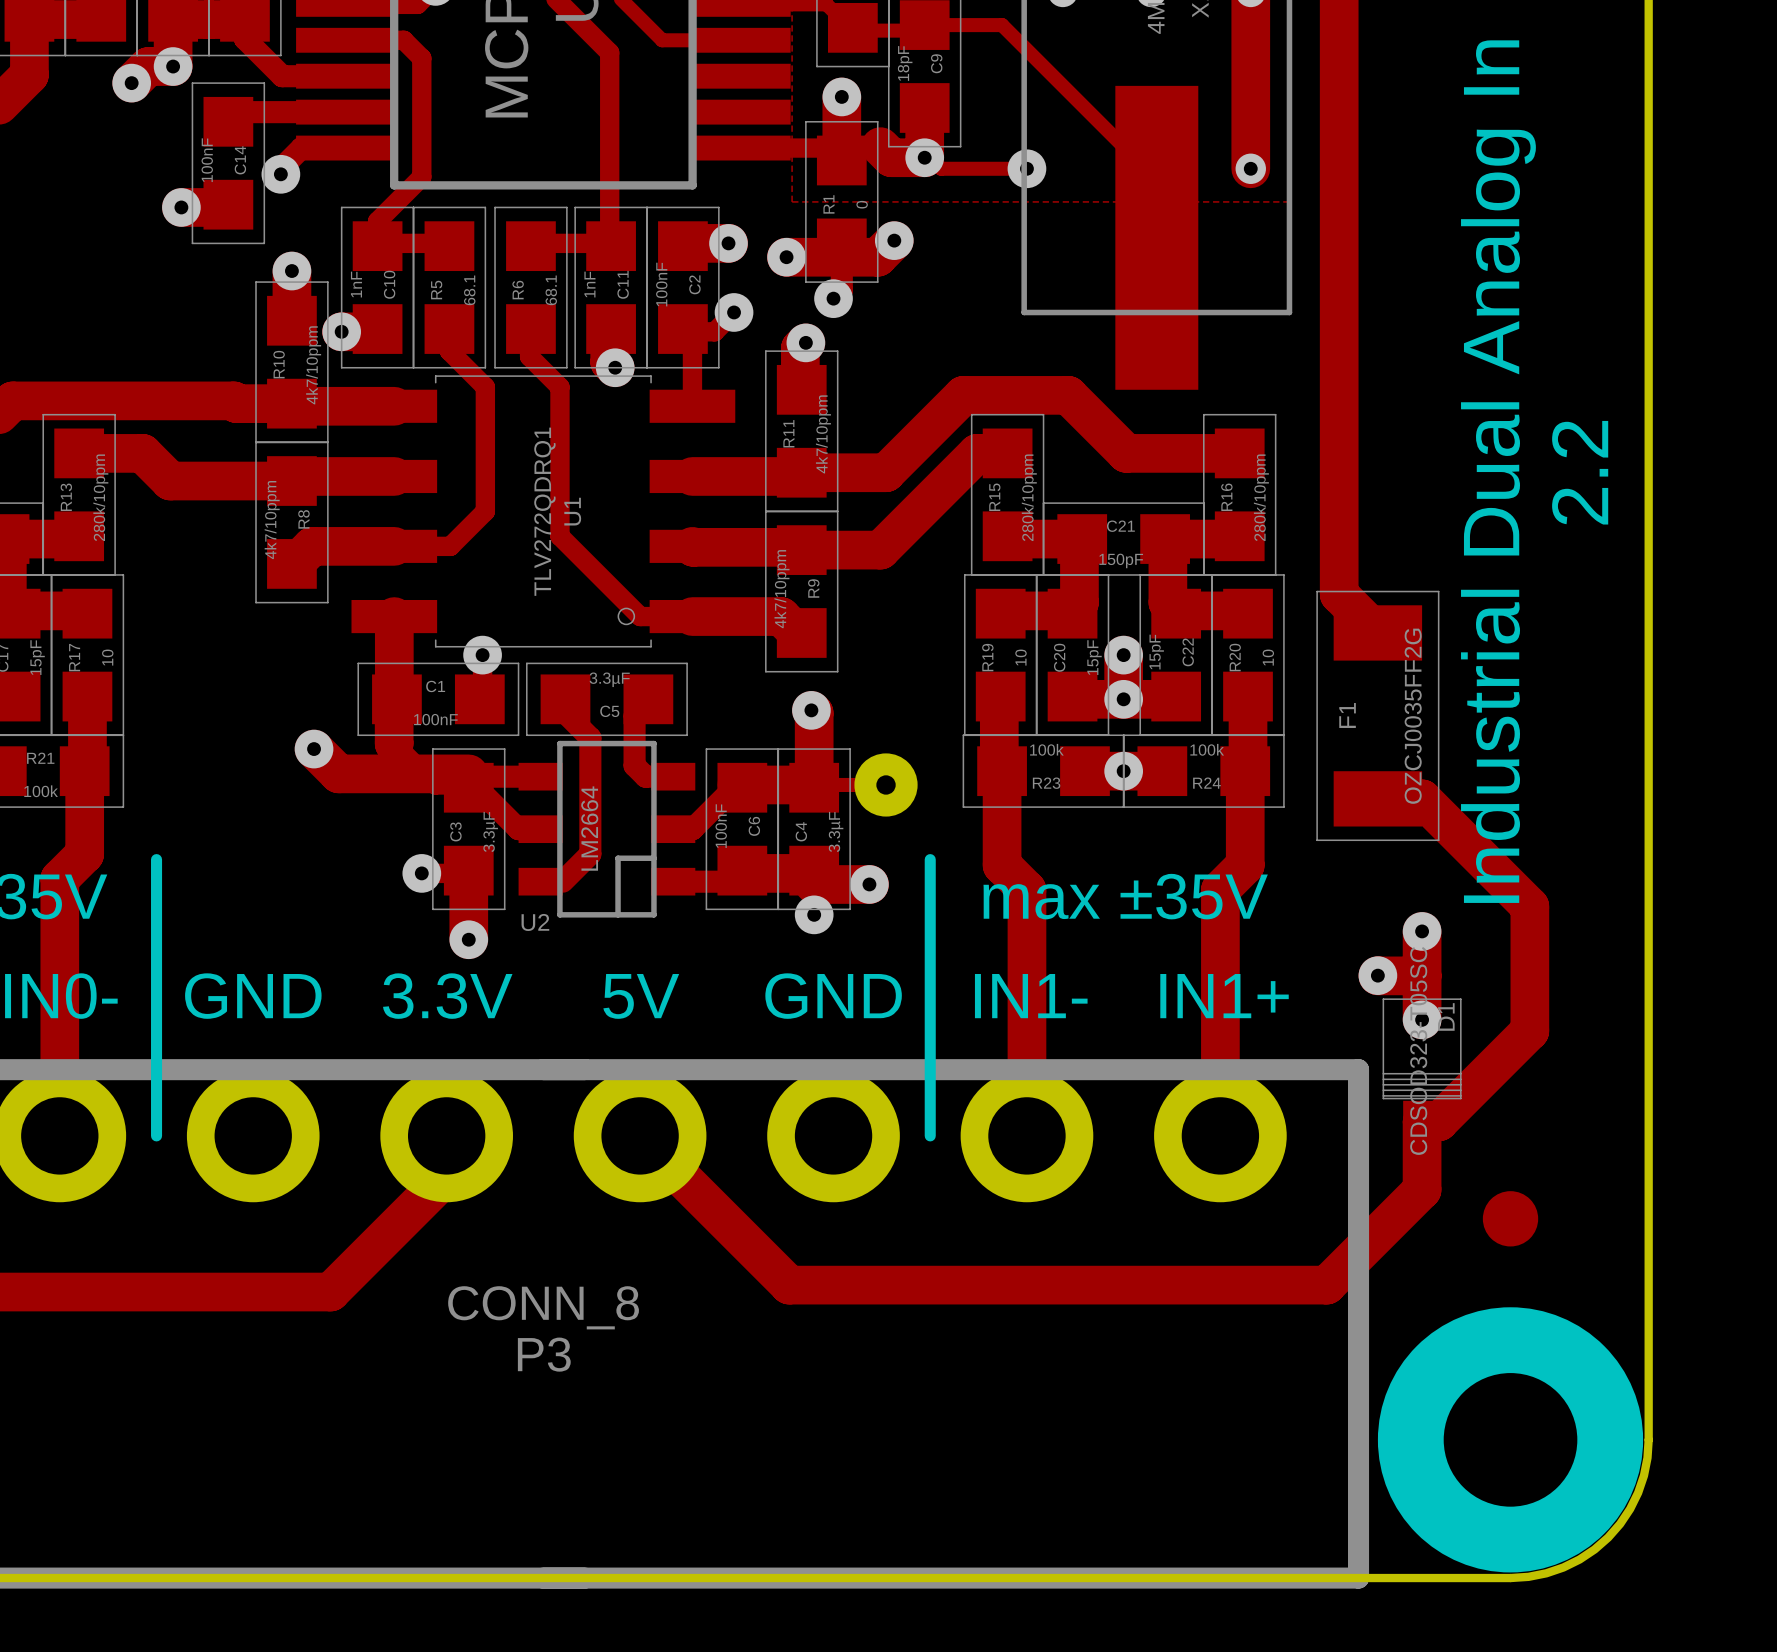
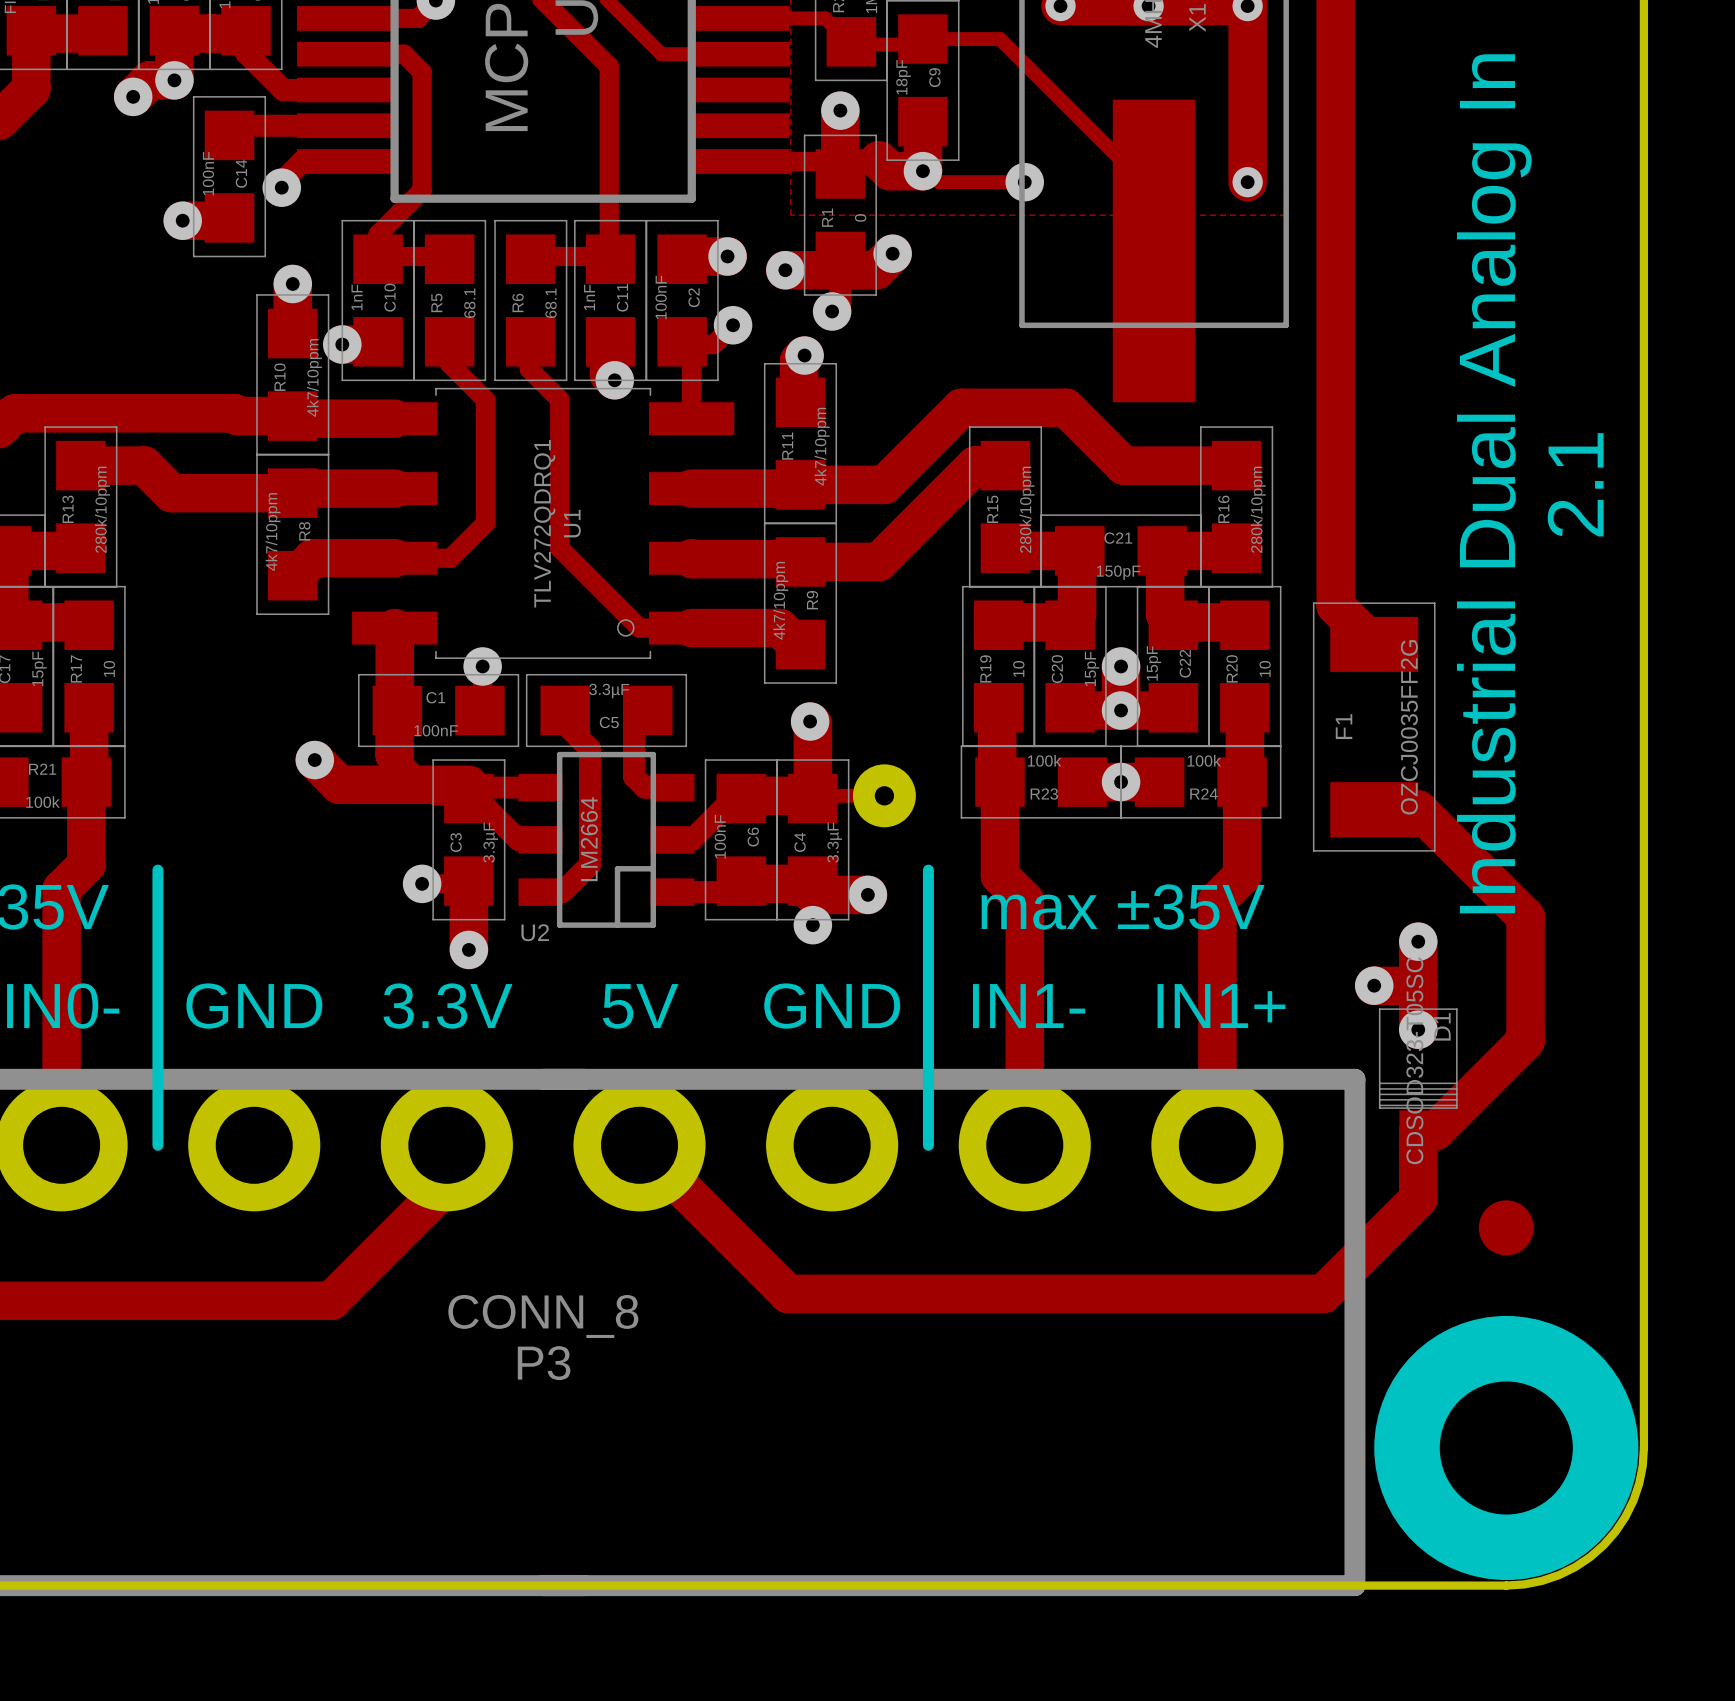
text: 2.2 (1580, 472) -> 2.1 (1575, 484)

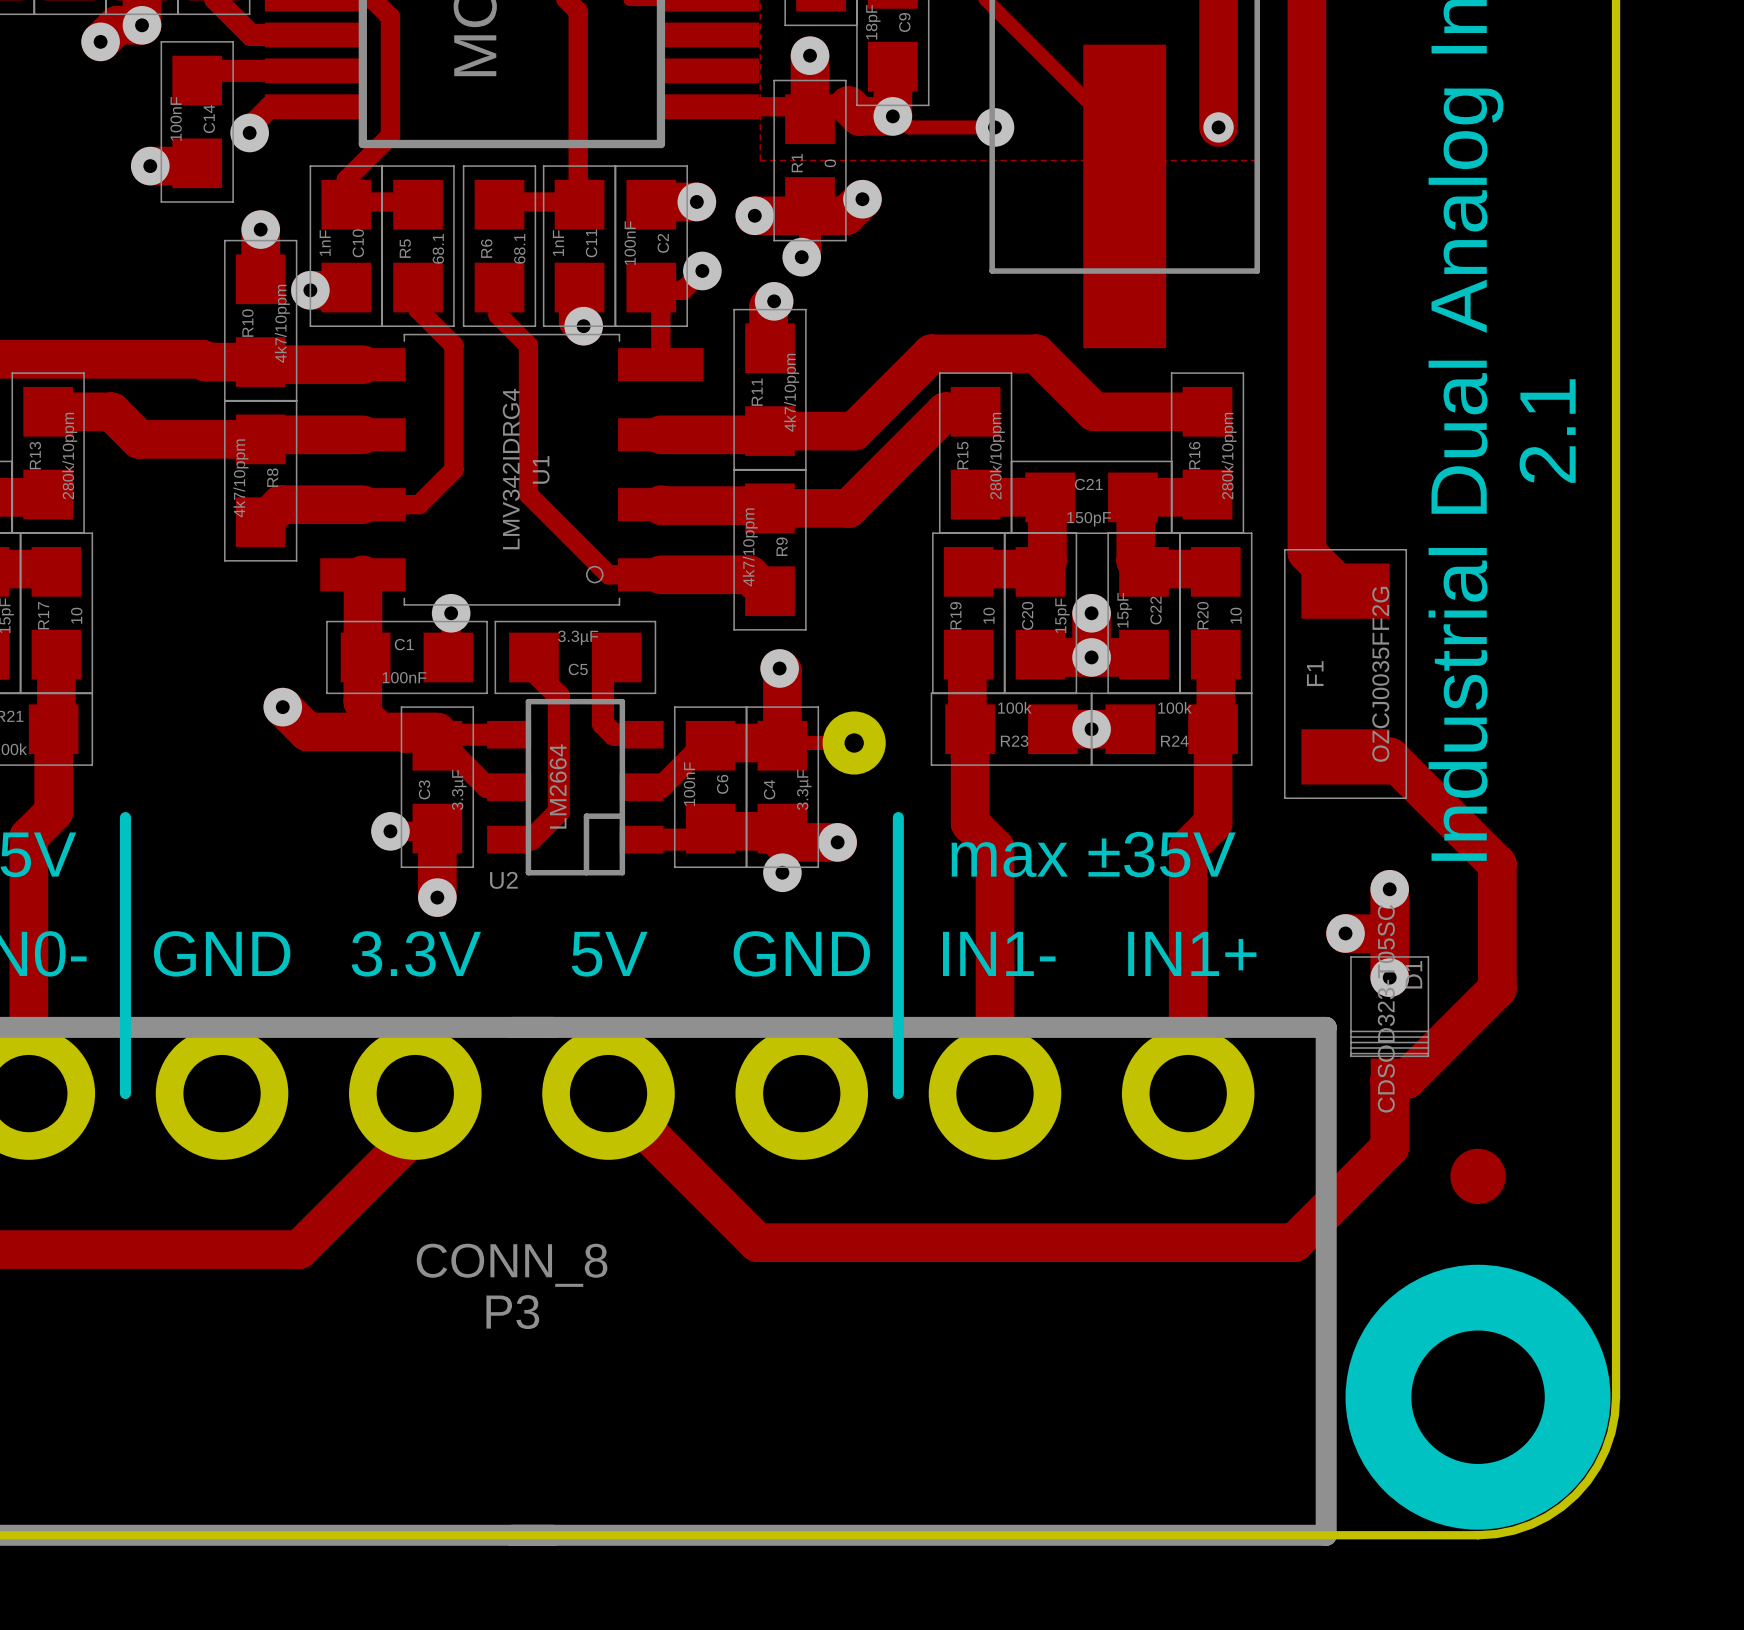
U1 value: TLV272QDRQ1 (544, 523) -> LMV342IDRG4 (511, 469)

